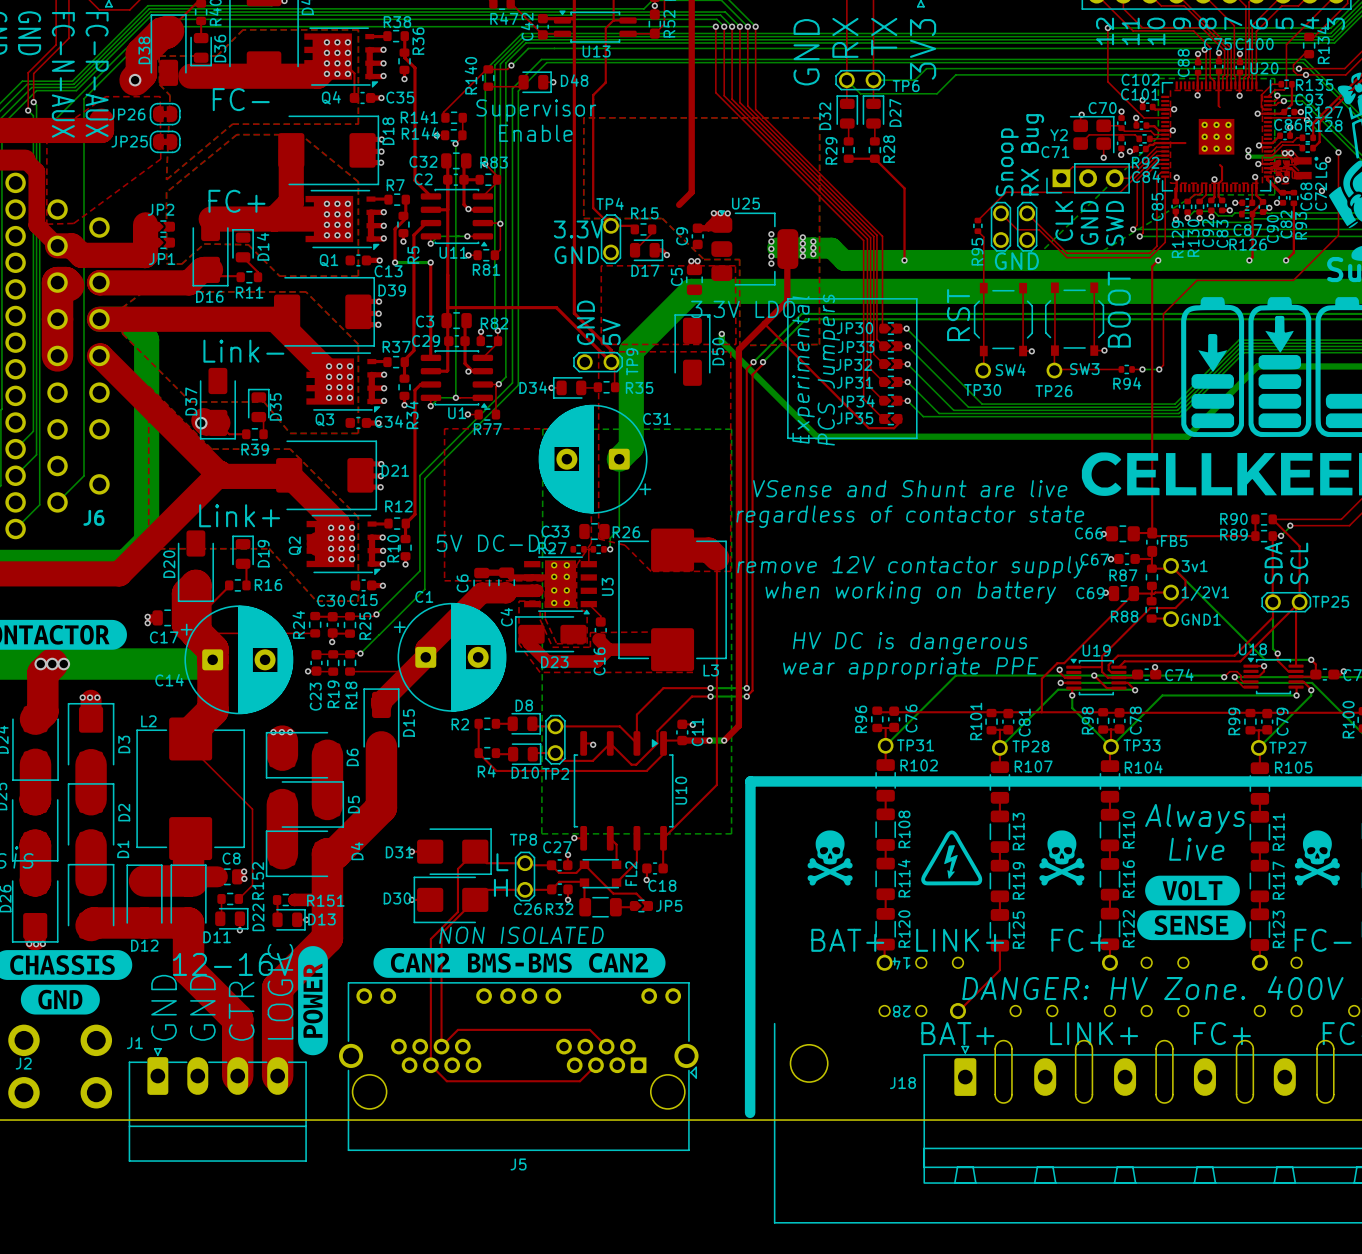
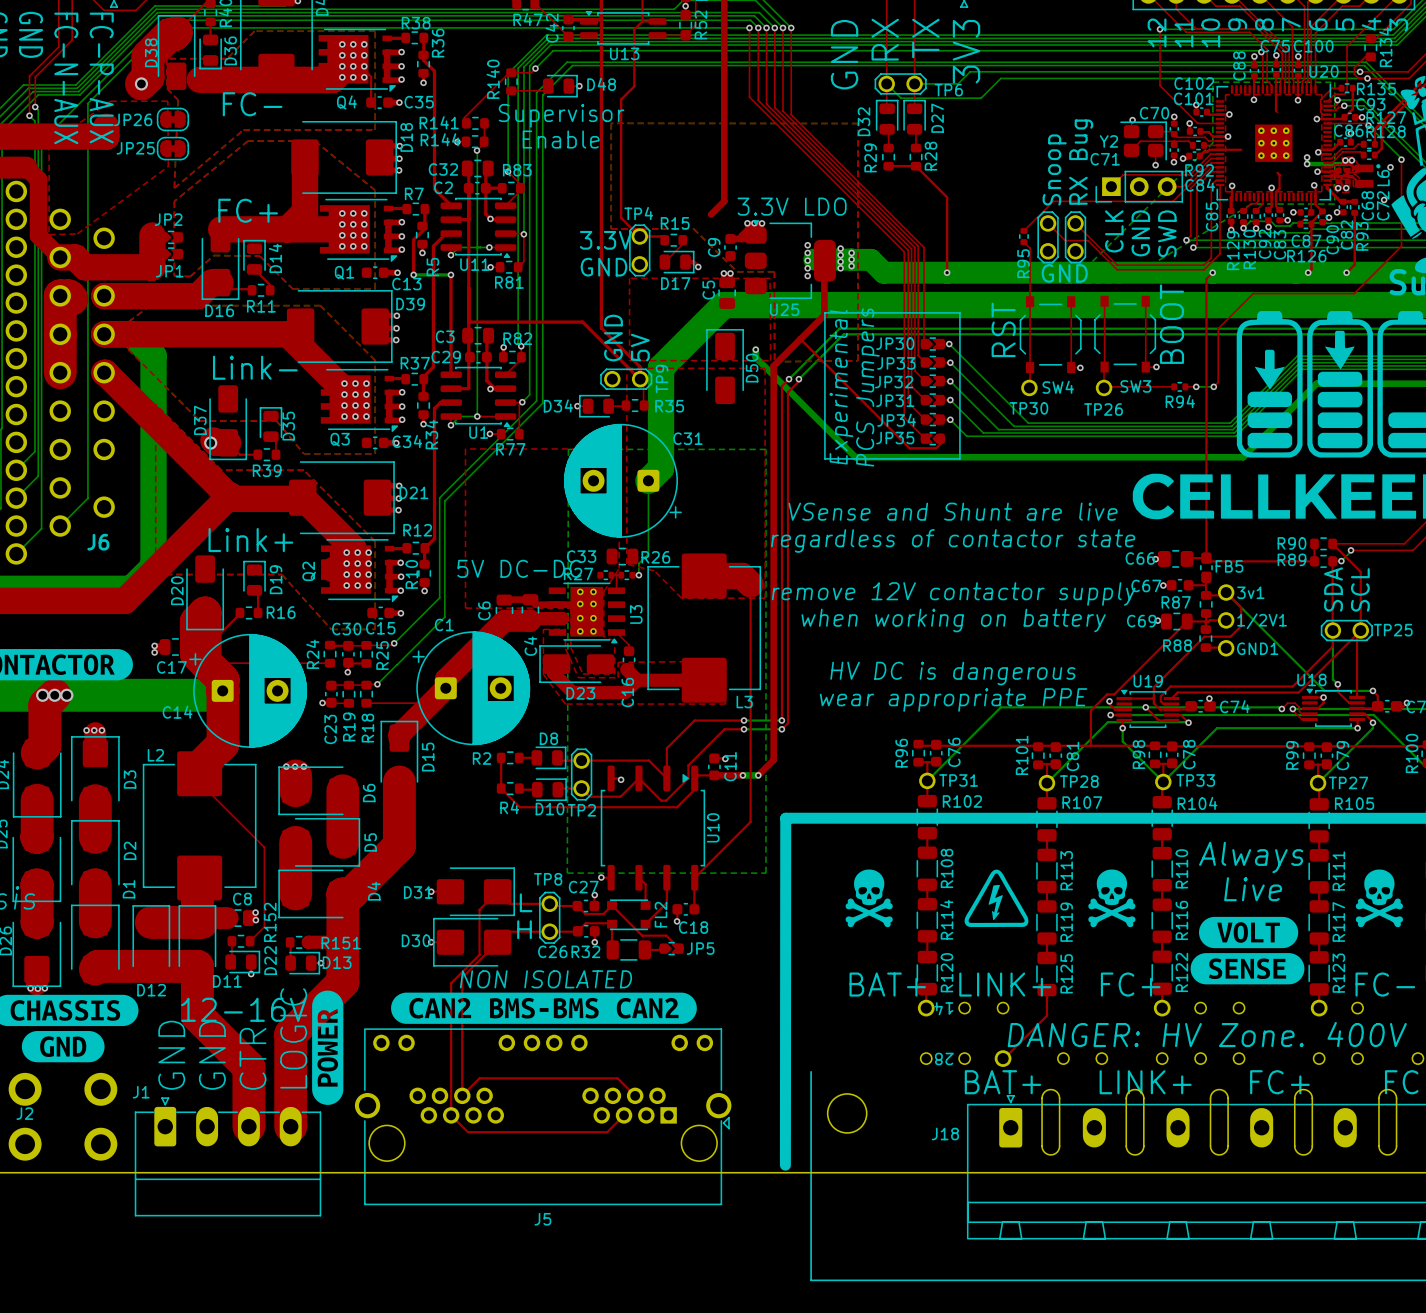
U25 name position: U25 (745, 203) -> U25 (784, 309)
text position: 3.3V LDO (743, 309) -> 3.3V LDO (792, 206)

